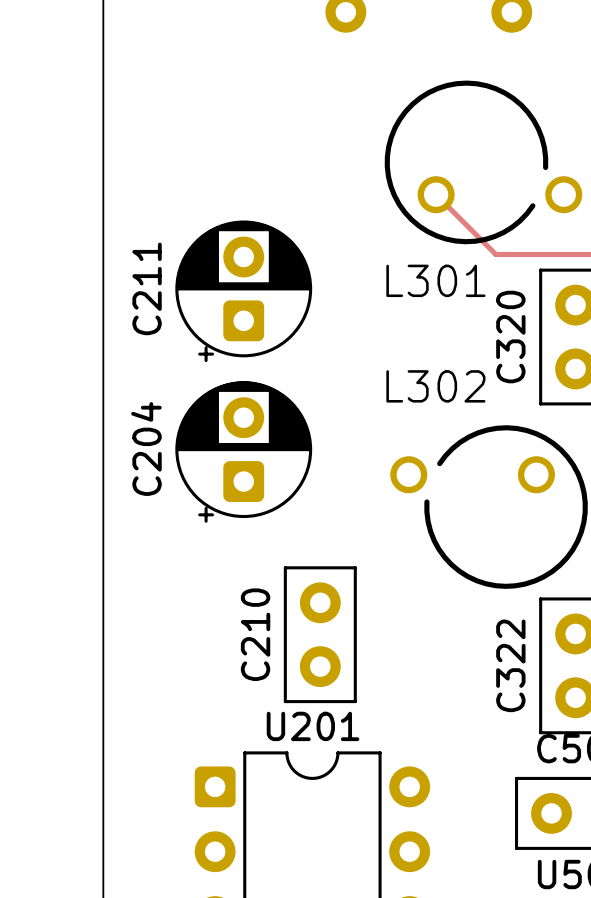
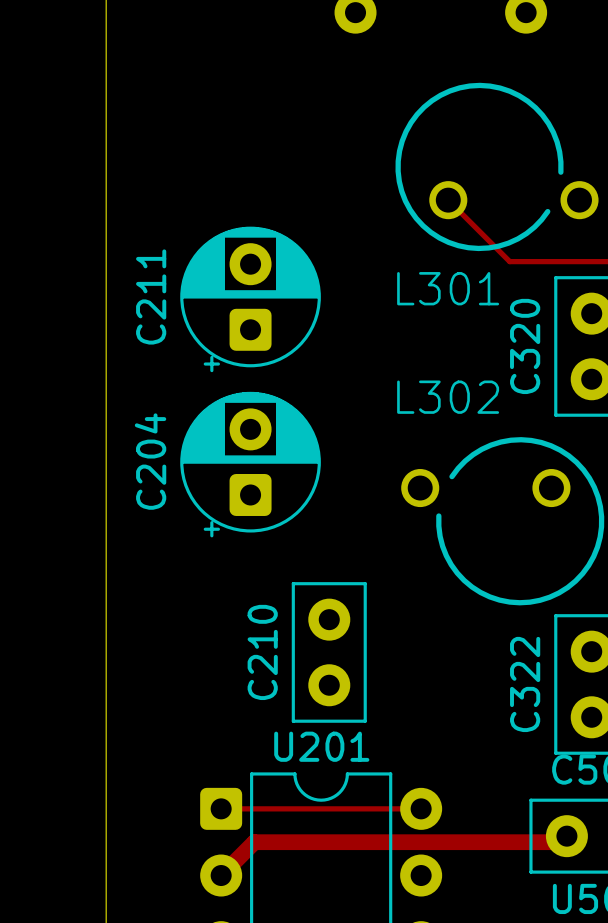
track: none -> (221, 808) (421, 808)
track: none -> (566, 836) (560, 842) (254, 842) (221, 875)

